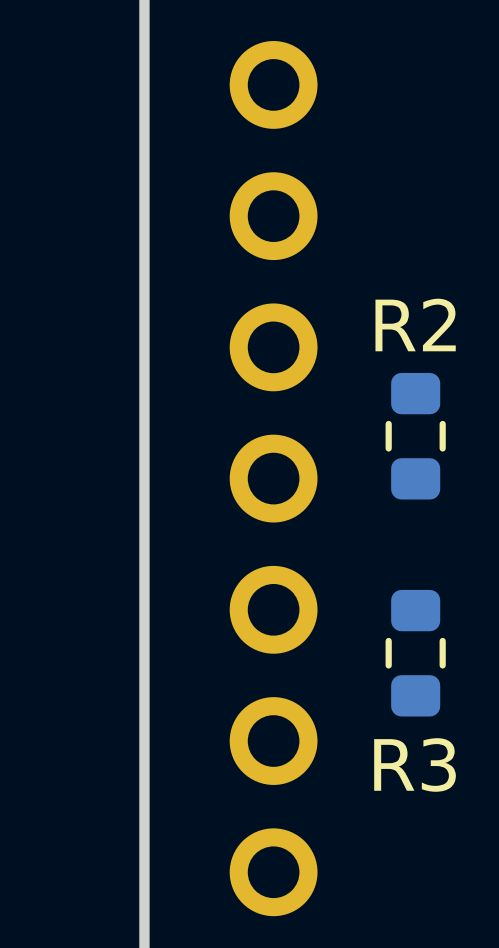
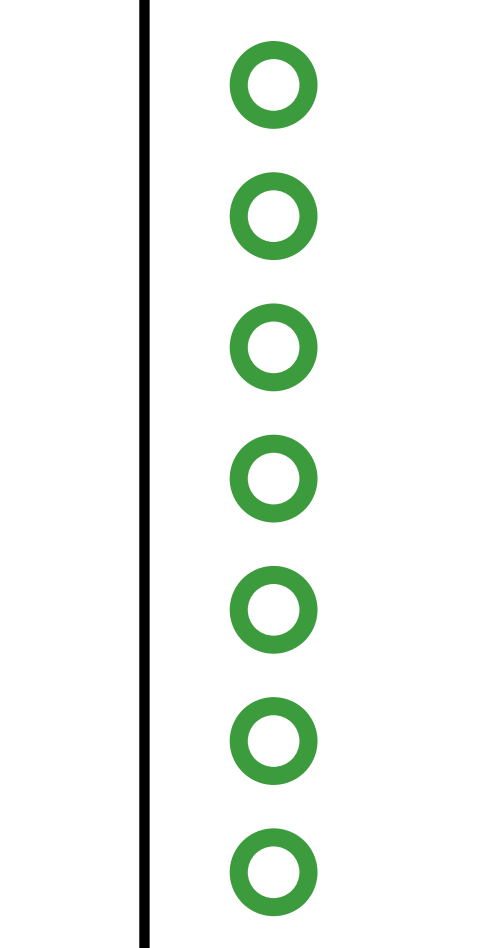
R2: (415, 436) -> none
R3: (415, 653) -> none

